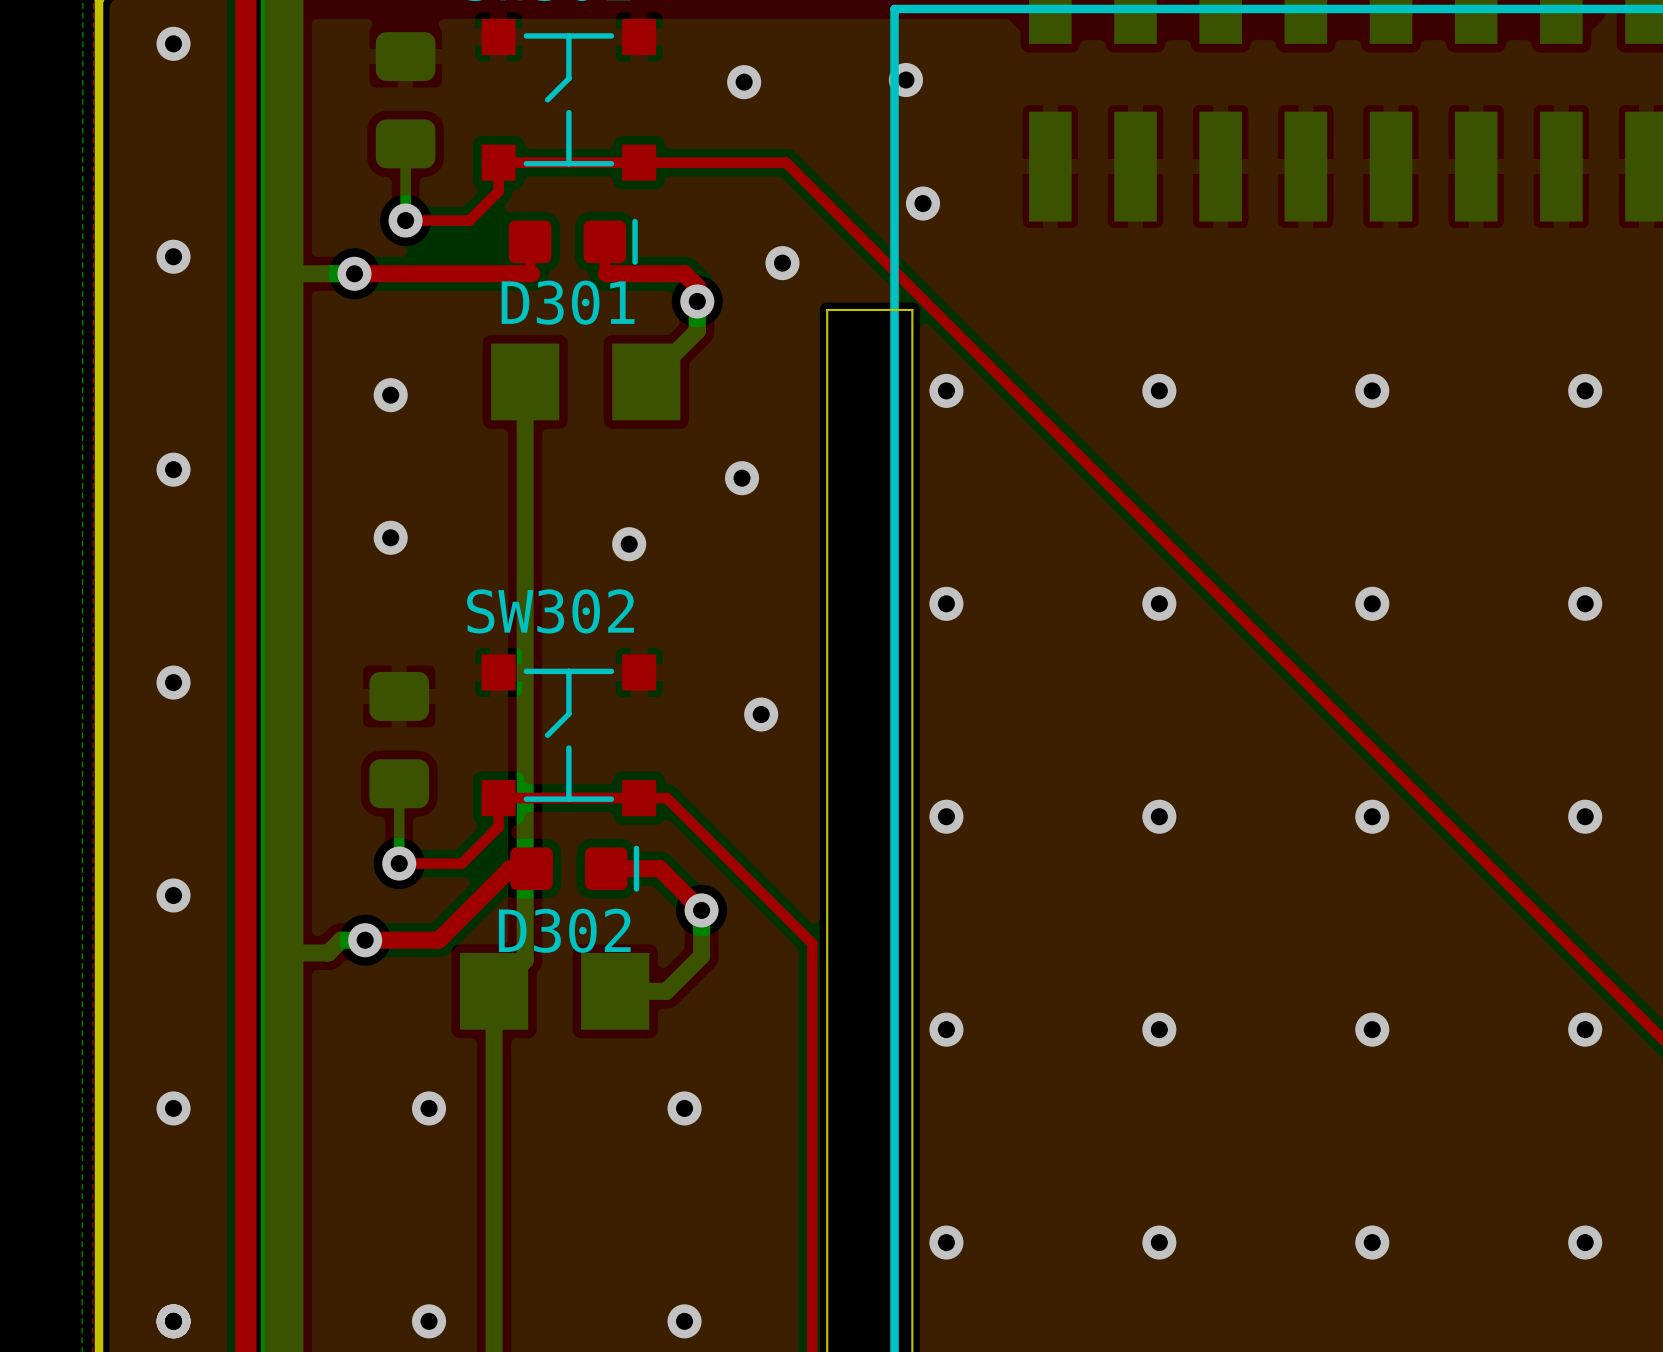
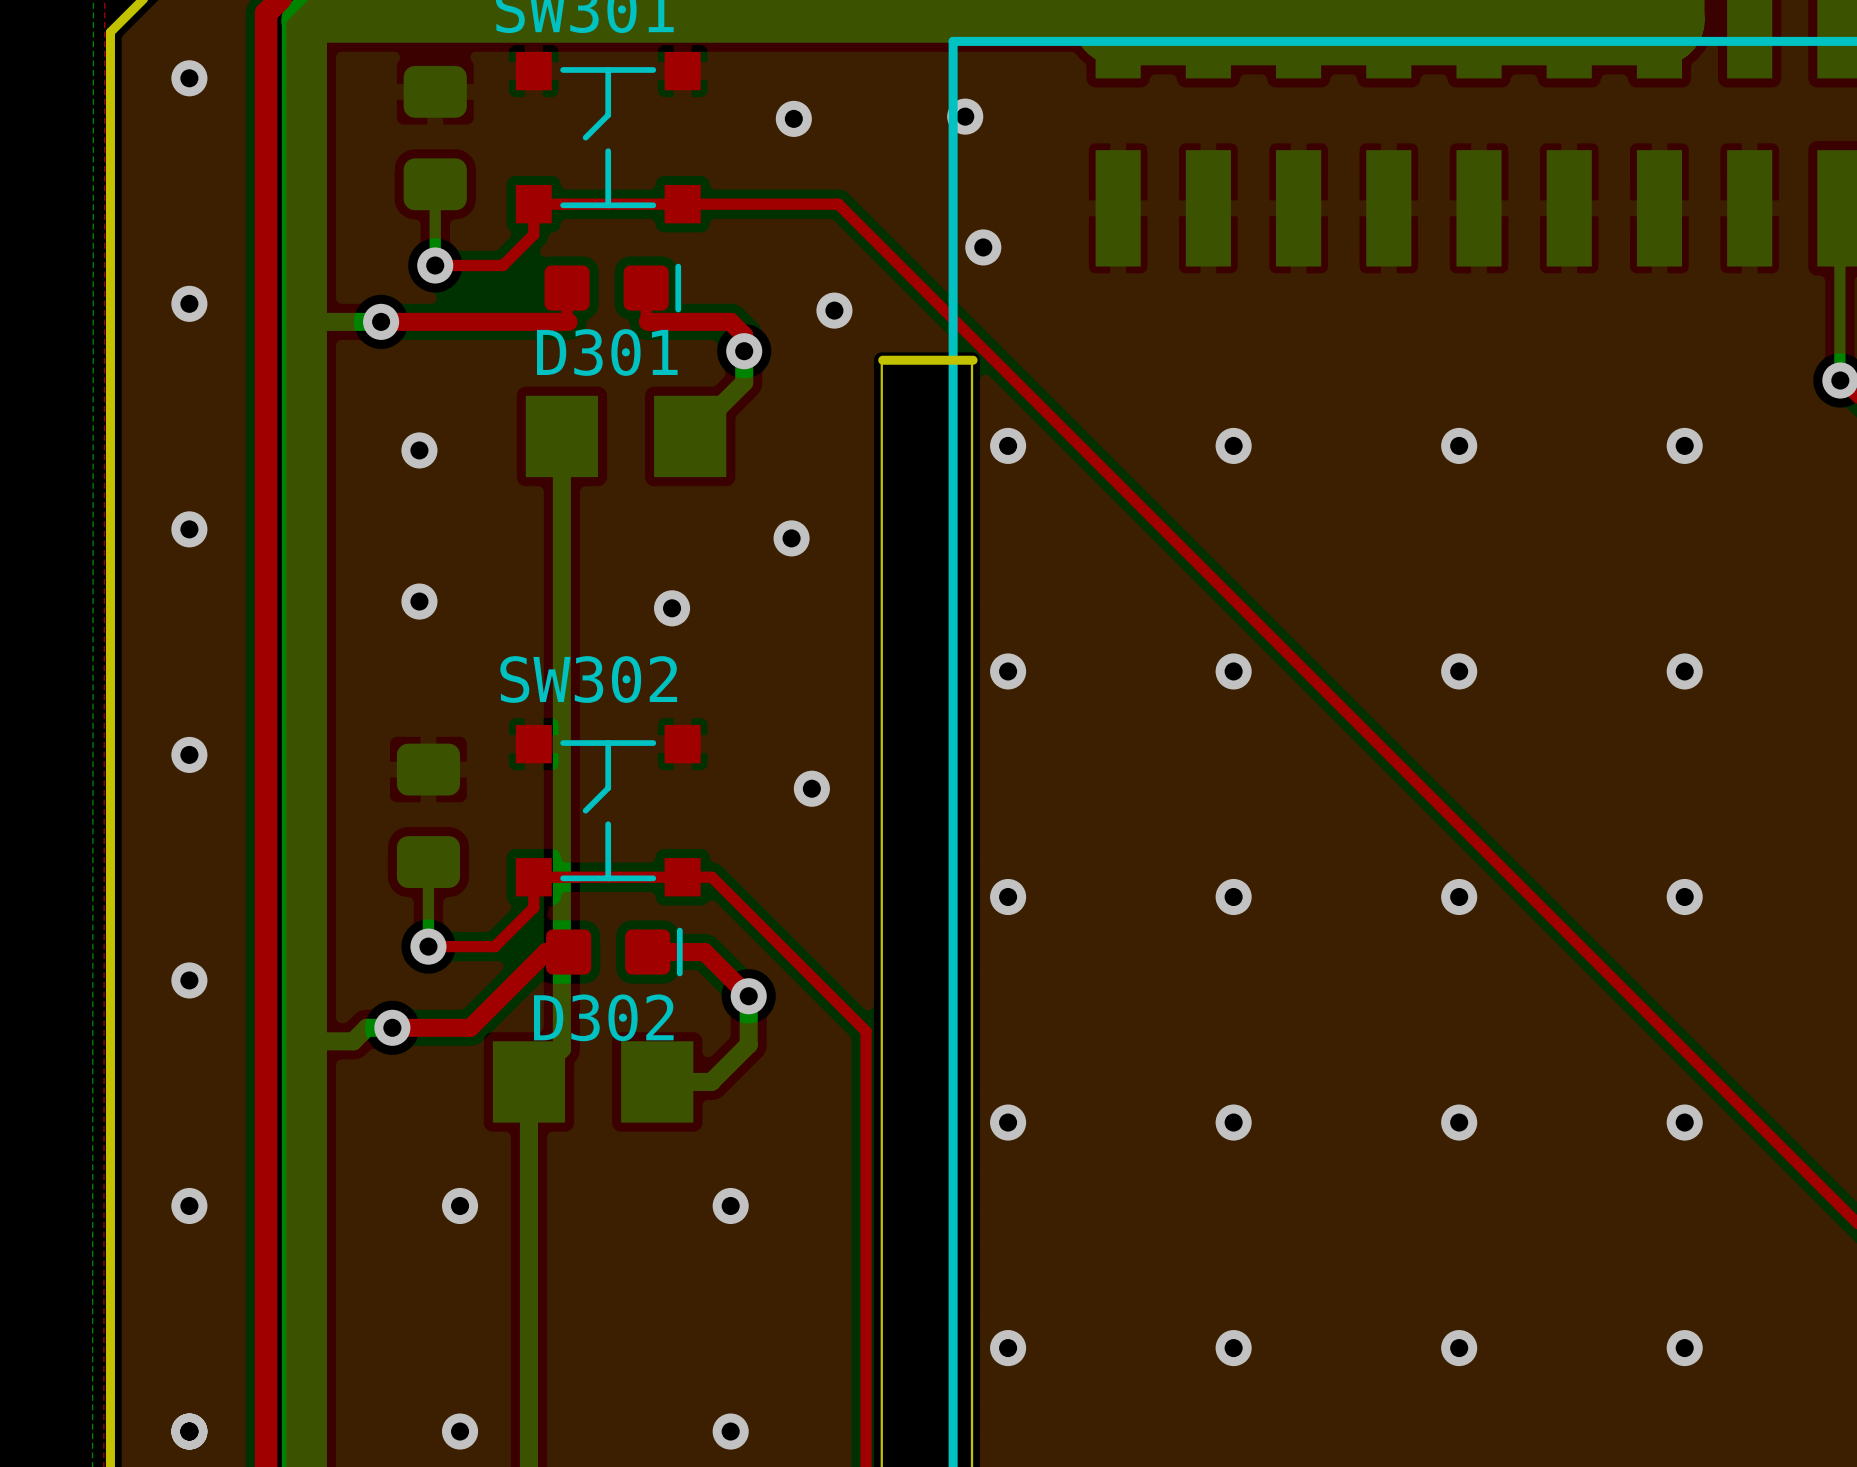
board edge width: thin (827, 309) (912, 309) -> thick (881, 360) (972, 360)

